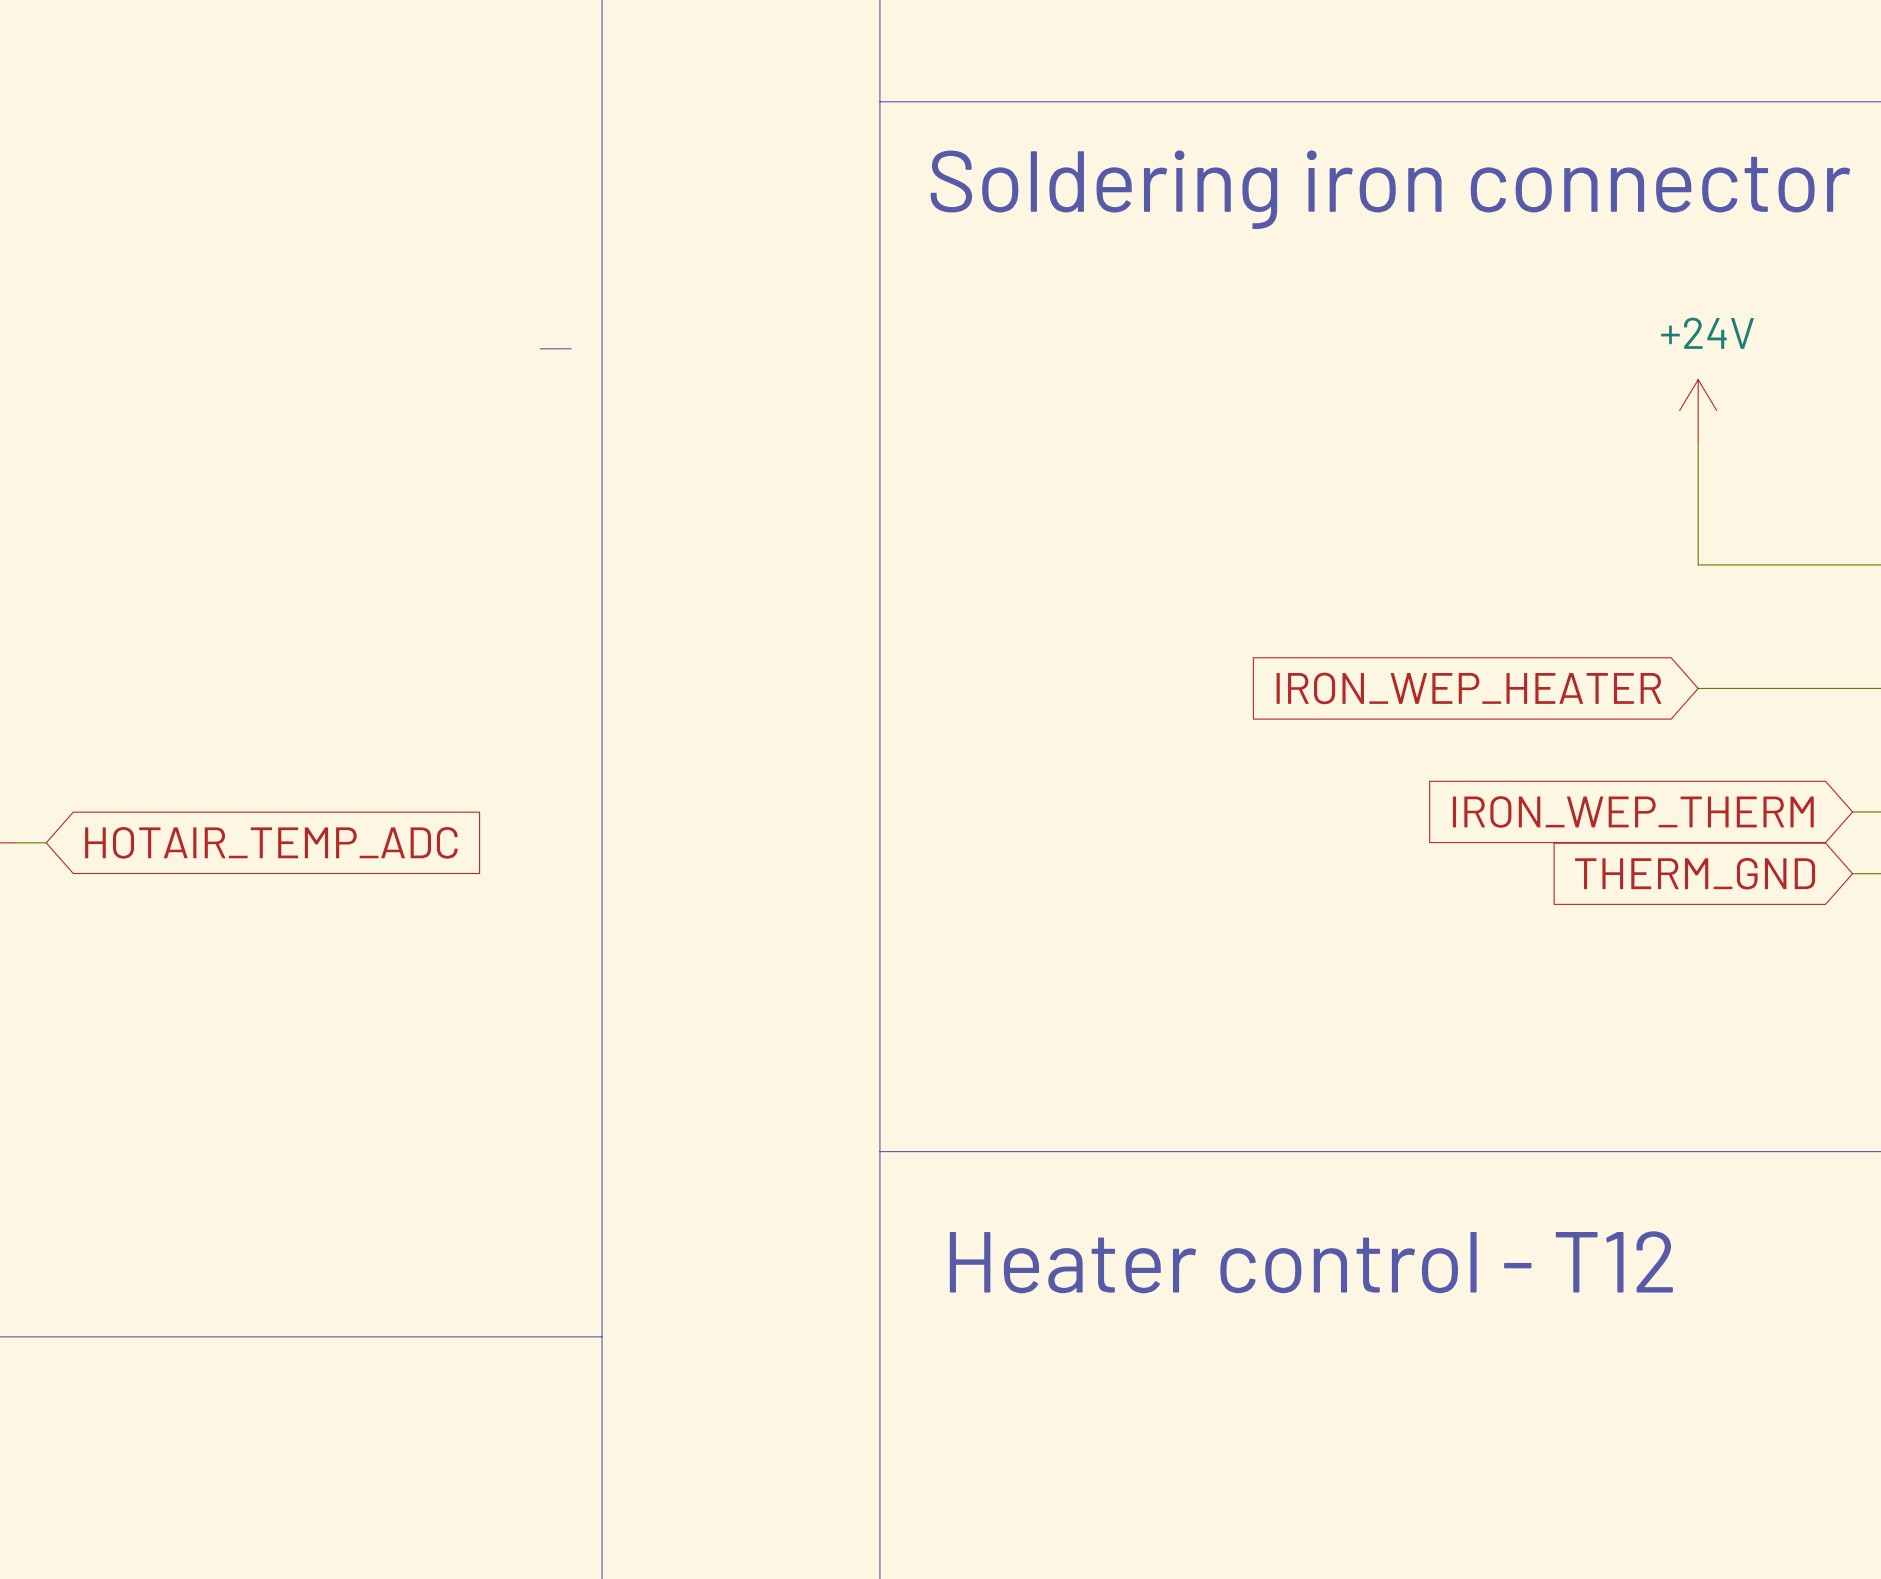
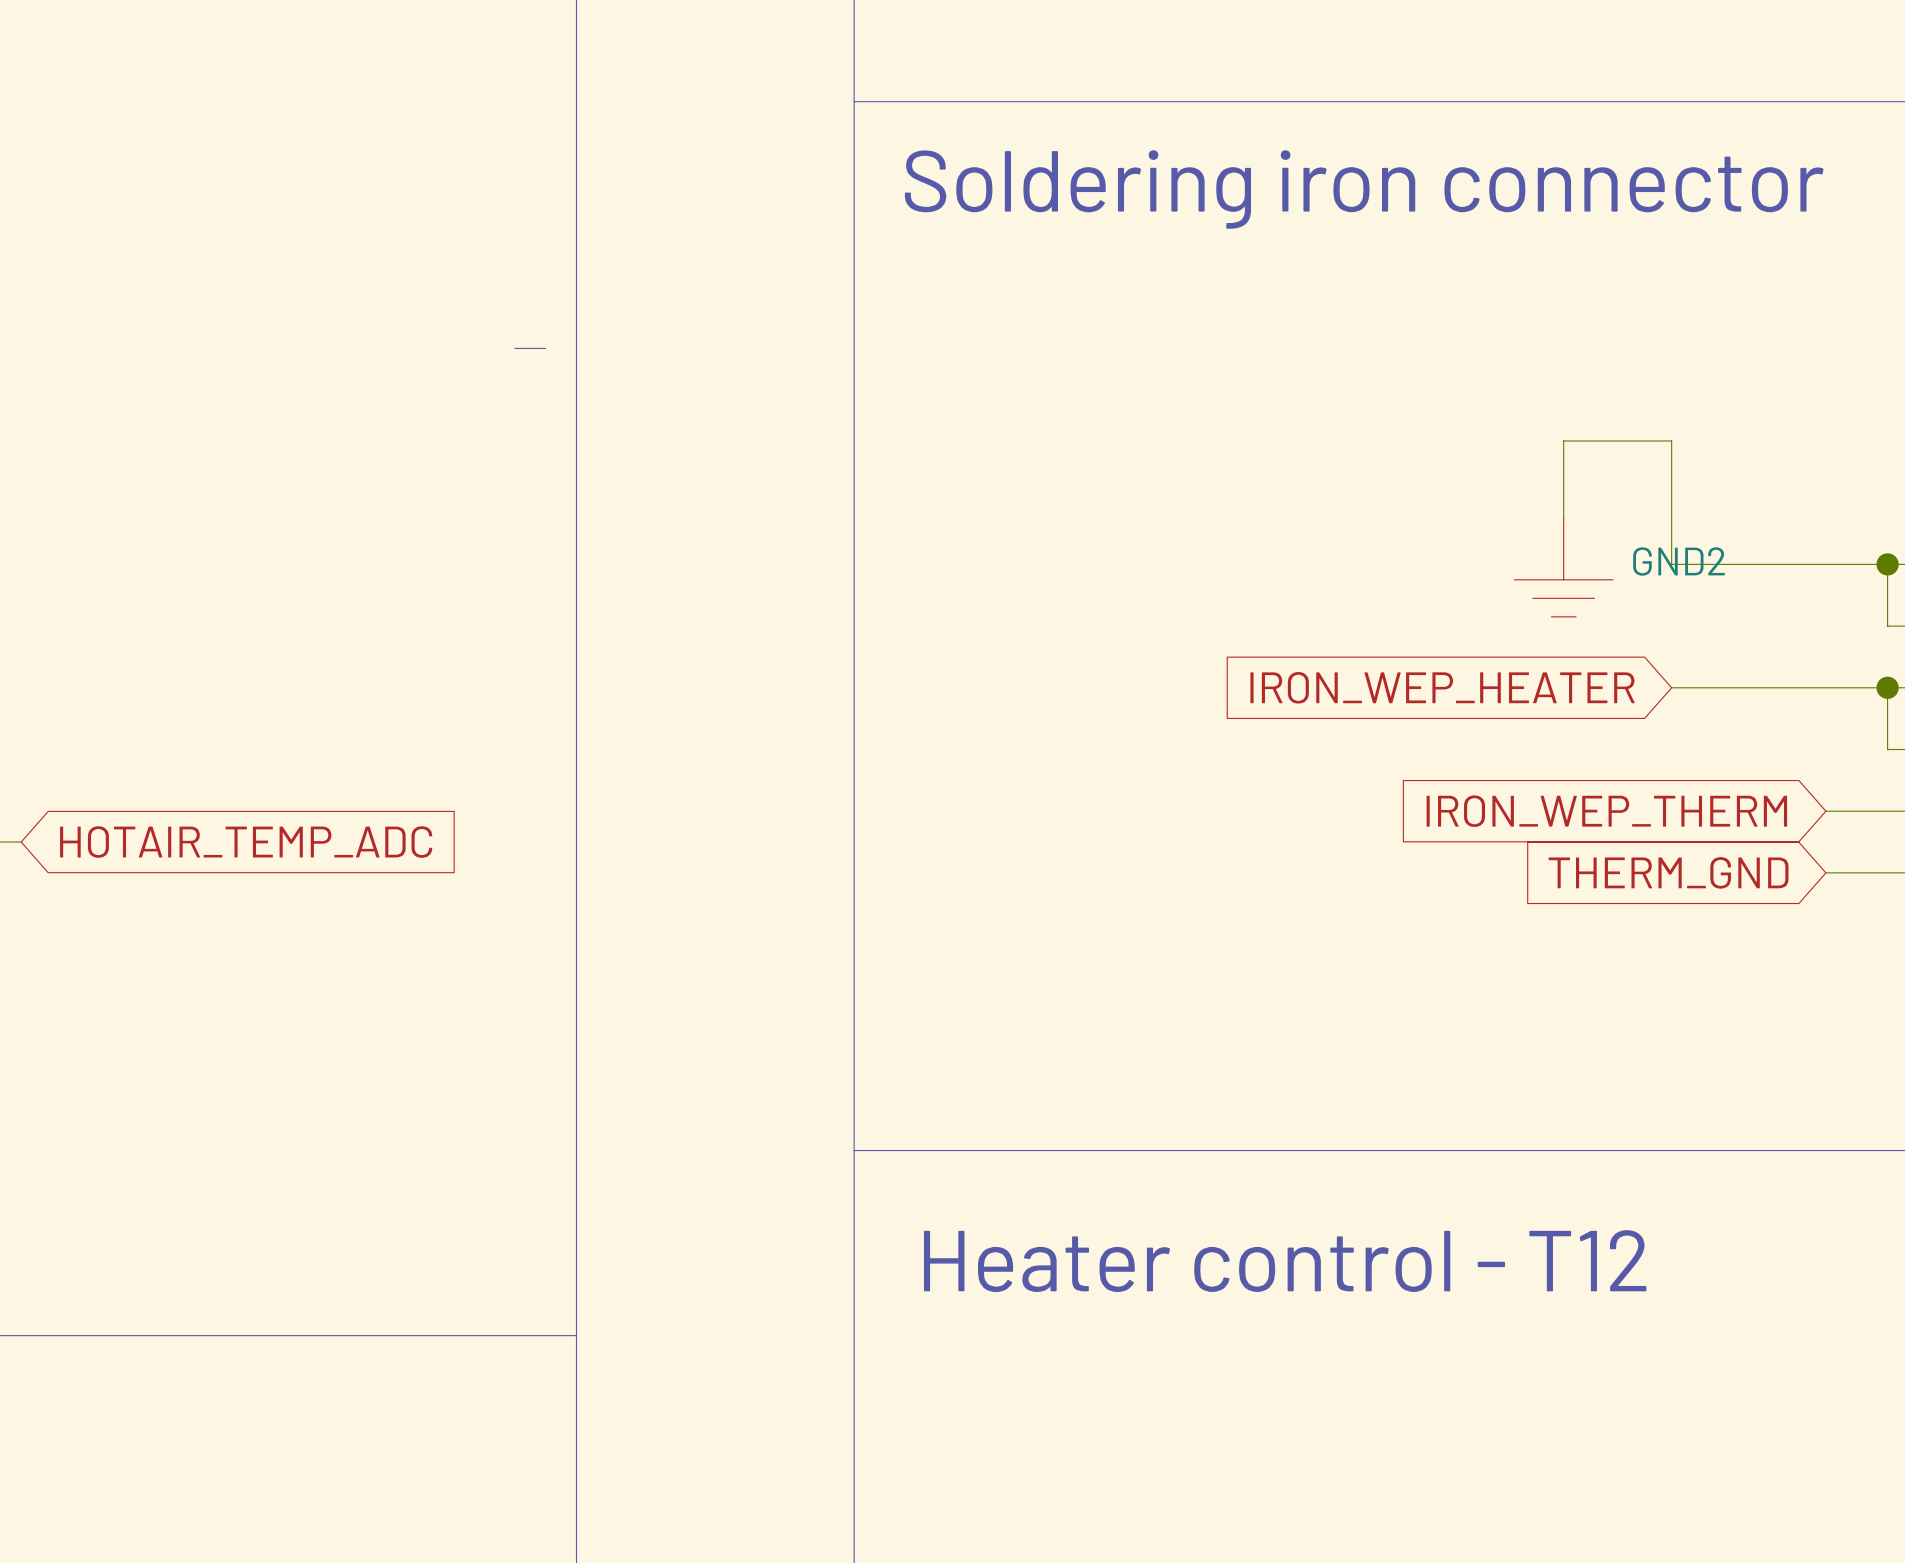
power symbol: +24V (1698, 410) -> none
wire: none -> (1671, 440) (1563, 440) (1563, 518)
power symbol: none -> GND2 (1563, 567)

